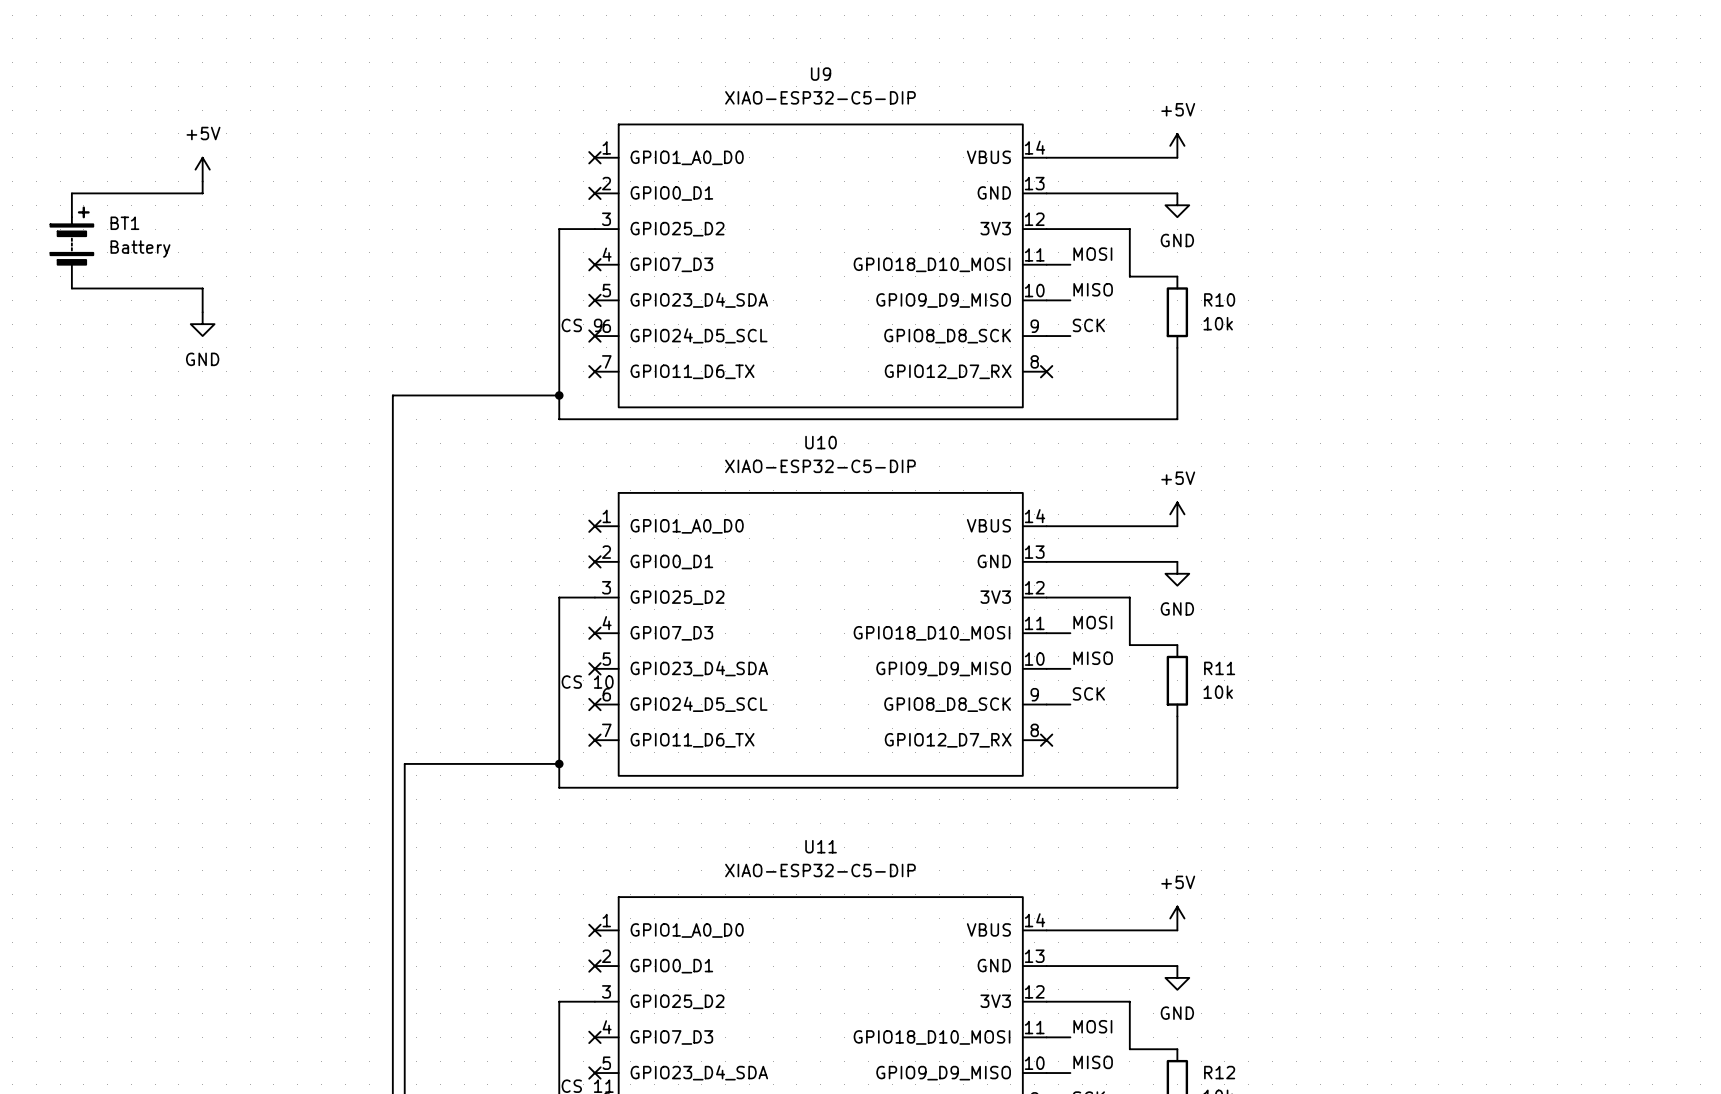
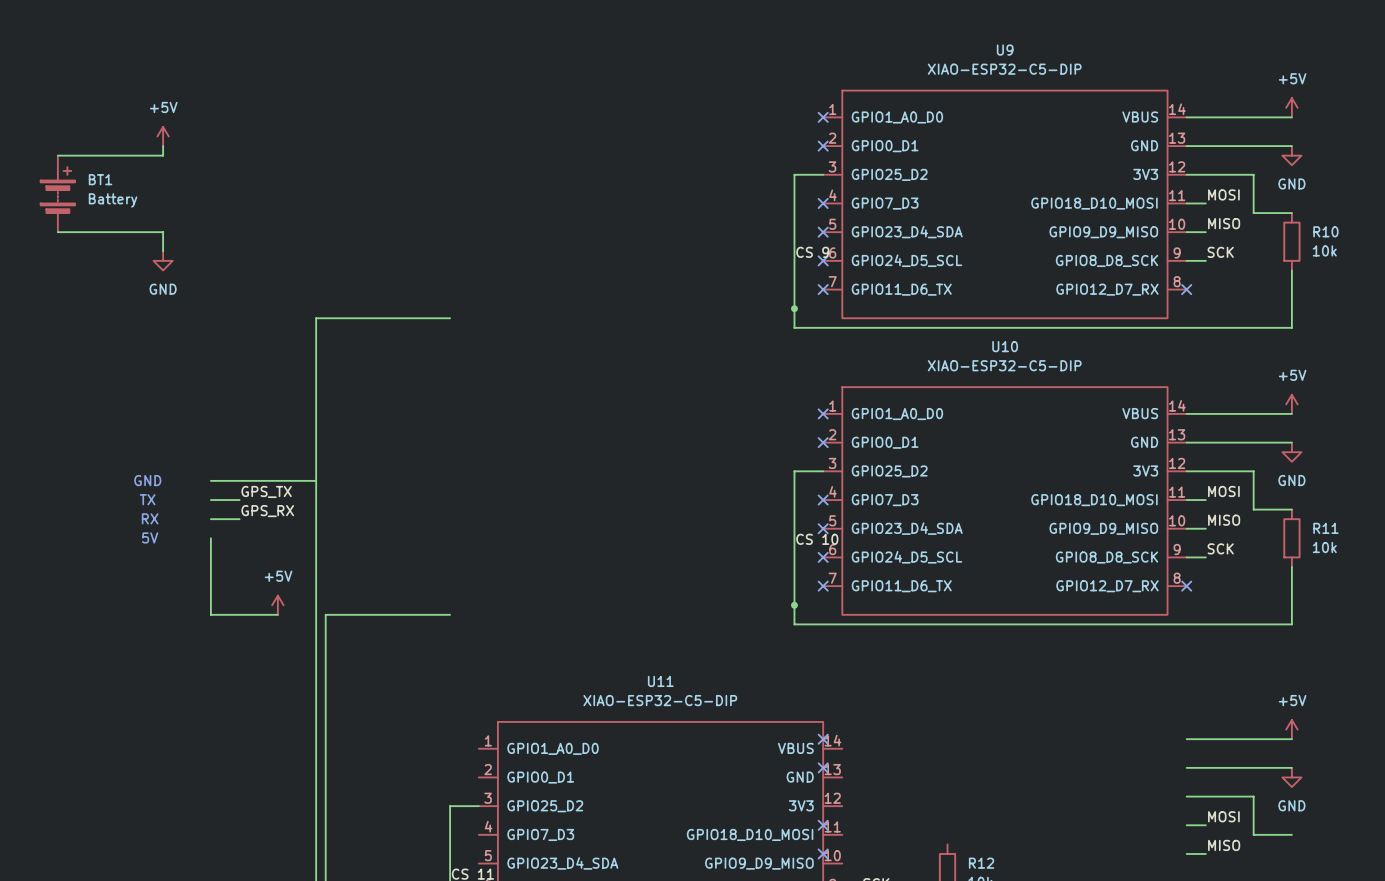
power symbol: none -> +5V (1291, 107)
no-connect mark: none -> (823, 117)
power symbol: +5V (1177, 145) -> none
wire: none -> (1186, 117) (1291, 117)
no-connect mark: (594, 157) -> none
wire: (1046, 157) (1177, 157) -> none
no-connect mark: none -> (823, 146)
wire: none -> (1186, 146) (1291, 146)
no-connect mark: (594, 193) -> none
wire: (1046, 193) (1177, 193) -> none
power symbol: none -> GND (1291, 155)
power symbol: GND (1177, 205) -> none
wire: none -> (823, 174) (794, 174) (794, 327) (1291, 327) (1291, 270)
wire: none -> (1186, 174) (1253, 174) (1253, 213) (1291, 213)
wire: (594, 229) (559, 229) (559, 419) (1177, 419) (1177, 347) -> none
wire: (1046, 229) (1129, 229) (1129, 276) (1177, 276) -> none
label: none -> MOSI (1223, 194)
no-connect mark: none -> (823, 203)
wire: none -> (1186, 203) (1205, 203)
label: MOSI (1092, 254) -> none
no-connect mark: (594, 264) -> none
wire: (1046, 264) (1070, 264) -> none
U9 position: (820, 265) -> (1004, 204)
label: none -> MISO (1224, 223)
no-connect mark: none -> (823, 232)
wire: none -> (1186, 232) (1205, 232)
label: MISO (1093, 289) -> none
no-connect mark: (594, 300) -> none
wire: (1046, 300) (1070, 300) -> none
R10 position: (1177, 312) -> (1291, 241)
label: none -> CS 9 (812, 252)
label: none -> SCK (1220, 252)
no-connect mark: none -> (823, 260)
wire: none -> (1186, 260) (1205, 260)
label: CS 9 (581, 325) -> none
label: SCK (1088, 325) -> none
no-connect mark: (594, 336) -> none
wire: (1046, 336) (1070, 336) -> none
no-connect mark: none -> (823, 289)
no-connect mark: none -> (1186, 289)
no-connect mark: (594, 371) -> none
no-connect mark: (1046, 371) -> none
junction: none -> (794, 308)
junction: (559, 395) -> none
power symbol: none -> +5V (1291, 404)
no-connect mark: none -> (823, 413)
power symbol: +5V (1177, 514) -> none
wire: none -> (1186, 413) (1291, 413)
no-connect mark: (594, 526) -> none
wire: (1046, 526) (1177, 526) -> none
no-connect mark: none -> (823, 442)
wire: none -> (1186, 442) (1291, 442)
no-connect mark: (594, 561) -> none
wire: (1046, 561) (1177, 561) -> none
power symbol: none -> GND (1291, 452)
power symbol: GND (1177, 573) -> none
wire: none -> (823, 471) (794, 471) (794, 624) (1291, 624) (1291, 566)
wire: none -> (1186, 471) (1253, 471) (1253, 509) (1291, 509)
text: none -> GND (147, 480)
wire: none -> (210, 480) (316, 480)
wire: (594, 597) (559, 597) (559, 787) (1177, 787) (1177, 716) -> none
wire: (1046, 597) (1129, 597) (1129, 645) (1177, 645) -> none
label: none -> MOSI (1223, 491)
label: none -> GPS_TX (266, 491)
text: none -> TX (147, 499)
wire: none -> (210, 500) (239, 500)
no-connect mark: none -> (823, 500)
wire: none -> (1186, 500) (1205, 500)
label: MOSI (1092, 622) -> none
no-connect mark: (594, 633) -> none
wire: (1046, 633) (1070, 633) -> none
U10 position: (820, 634) -> (1004, 500)
label: none -> GPS_RX (267, 511)
text: none -> RX (150, 518)
wire: none -> (210, 519) (239, 519)
label: none -> MISO (1224, 520)
no-connect mark: none -> (823, 528)
wire: none -> (1186, 528) (1205, 528)
label: MISO (1093, 658) -> none
text: none -> 5V (150, 537)
wire: none -> (210, 538) (210, 614) (277, 614)
no-connect mark: (594, 668) -> none
wire: (1046, 668) (1070, 668) -> none
label: none -> CS 10 (817, 539)
R11 position: (1177, 680) -> (1291, 538)
label: CS 10 (587, 682) -> none
label: none -> SCK (1220, 548)
no-connect mark: none -> (823, 557)
wire: none -> (1186, 557) (1205, 557)
label: SCK (1088, 693) -> none
no-connect mark: (594, 704) -> none
wire: (1046, 704) (1070, 704) -> none
no-connect mark: none -> (823, 586)
no-connect mark: none -> (1186, 586)
no-connect mark: (594, 740) -> none
no-connect mark: (1046, 740) -> none
power symbol: none -> +5V (277, 605)
junction: none -> (794, 605)
junction: (559, 763) -> none
power symbol: none -> +5V (1291, 729)
no-connect mark: none -> (823, 739)
power symbol: +5V (1177, 918) -> none
wire: none -> (1186, 739) (1291, 739)
no-connect mark: (594, 930) -> none
wire: (1046, 930) (1177, 930) -> none
no-connect mark: none -> (823, 767)
wire: none -> (1186, 767) (1291, 767)
no-connect mark: (594, 966) -> none
wire: (1046, 966) (1177, 966) -> none
power symbol: none -> GND (1291, 777)
power symbol: GND (1177, 977) -> none
wire: none -> (1186, 796) (1253, 796) (1253, 834) (1291, 834)
wire: (1046, 1001) (1129, 1001) (1129, 1049) (1177, 1049) -> none
label: none -> MOSI (1223, 816)
no-connect mark: none -> (823, 825)
wire: none -> (1186, 825) (1205, 825)
label: MOSI (1092, 1026) -> none
no-connect mark: (594, 1037) -> none
wire: (1046, 1037) (1070, 1037) -> none
label: none -> MISO (1224, 845)
no-connect mark: none -> (823, 853)
wire: none -> (1186, 853) (1205, 853)
label: MISO (1093, 1062) -> none
no-connect mark: (594, 1073) -> none
wire: (1046, 1073) (1070, 1073) -> none

